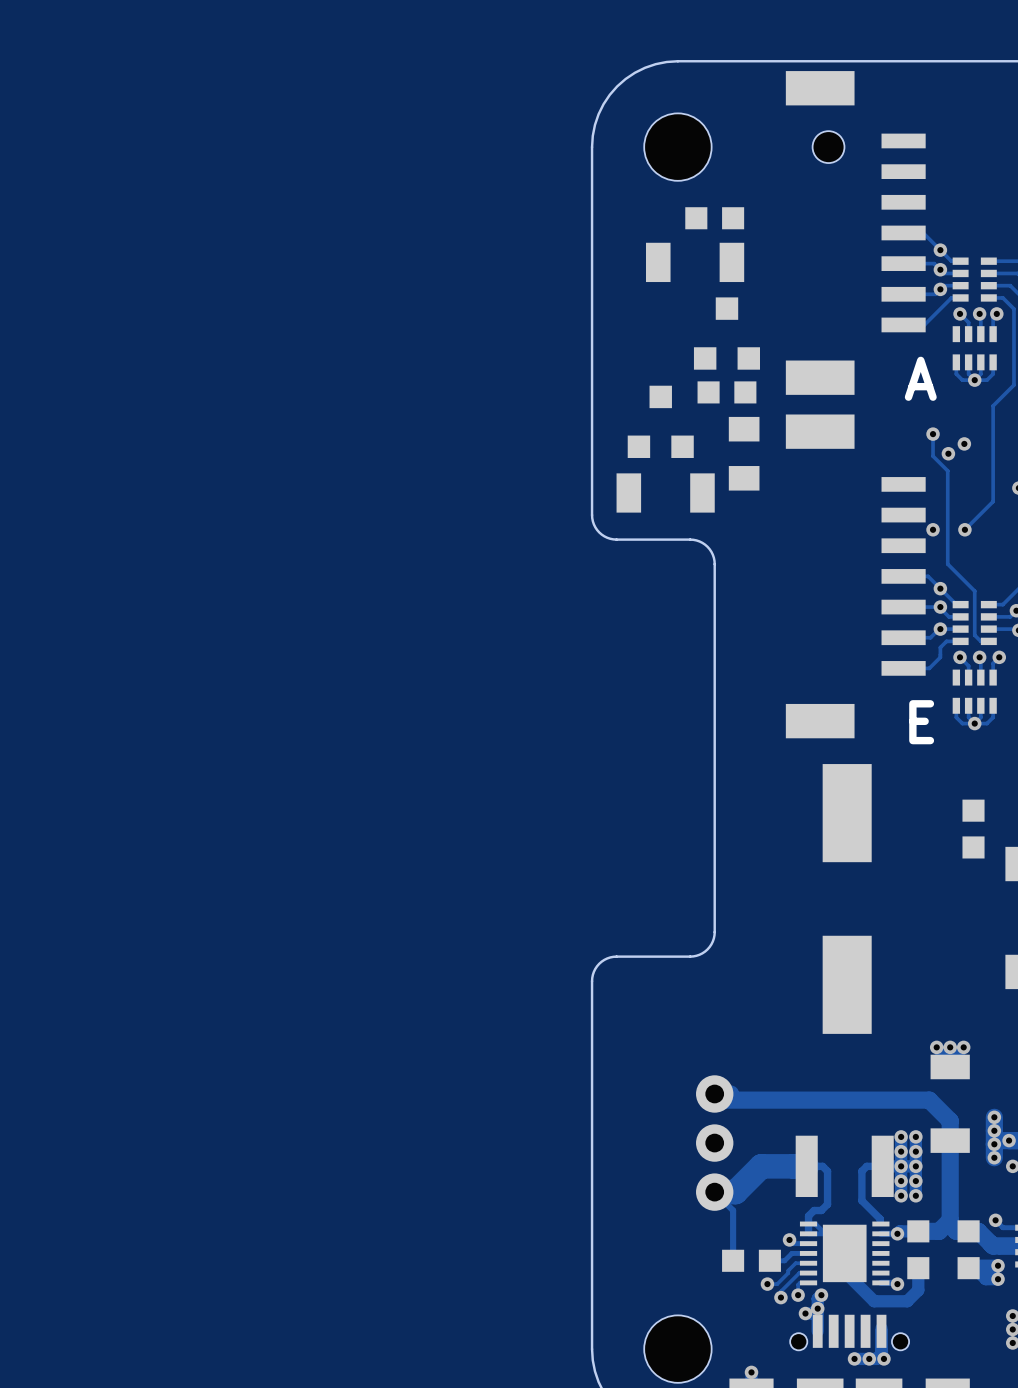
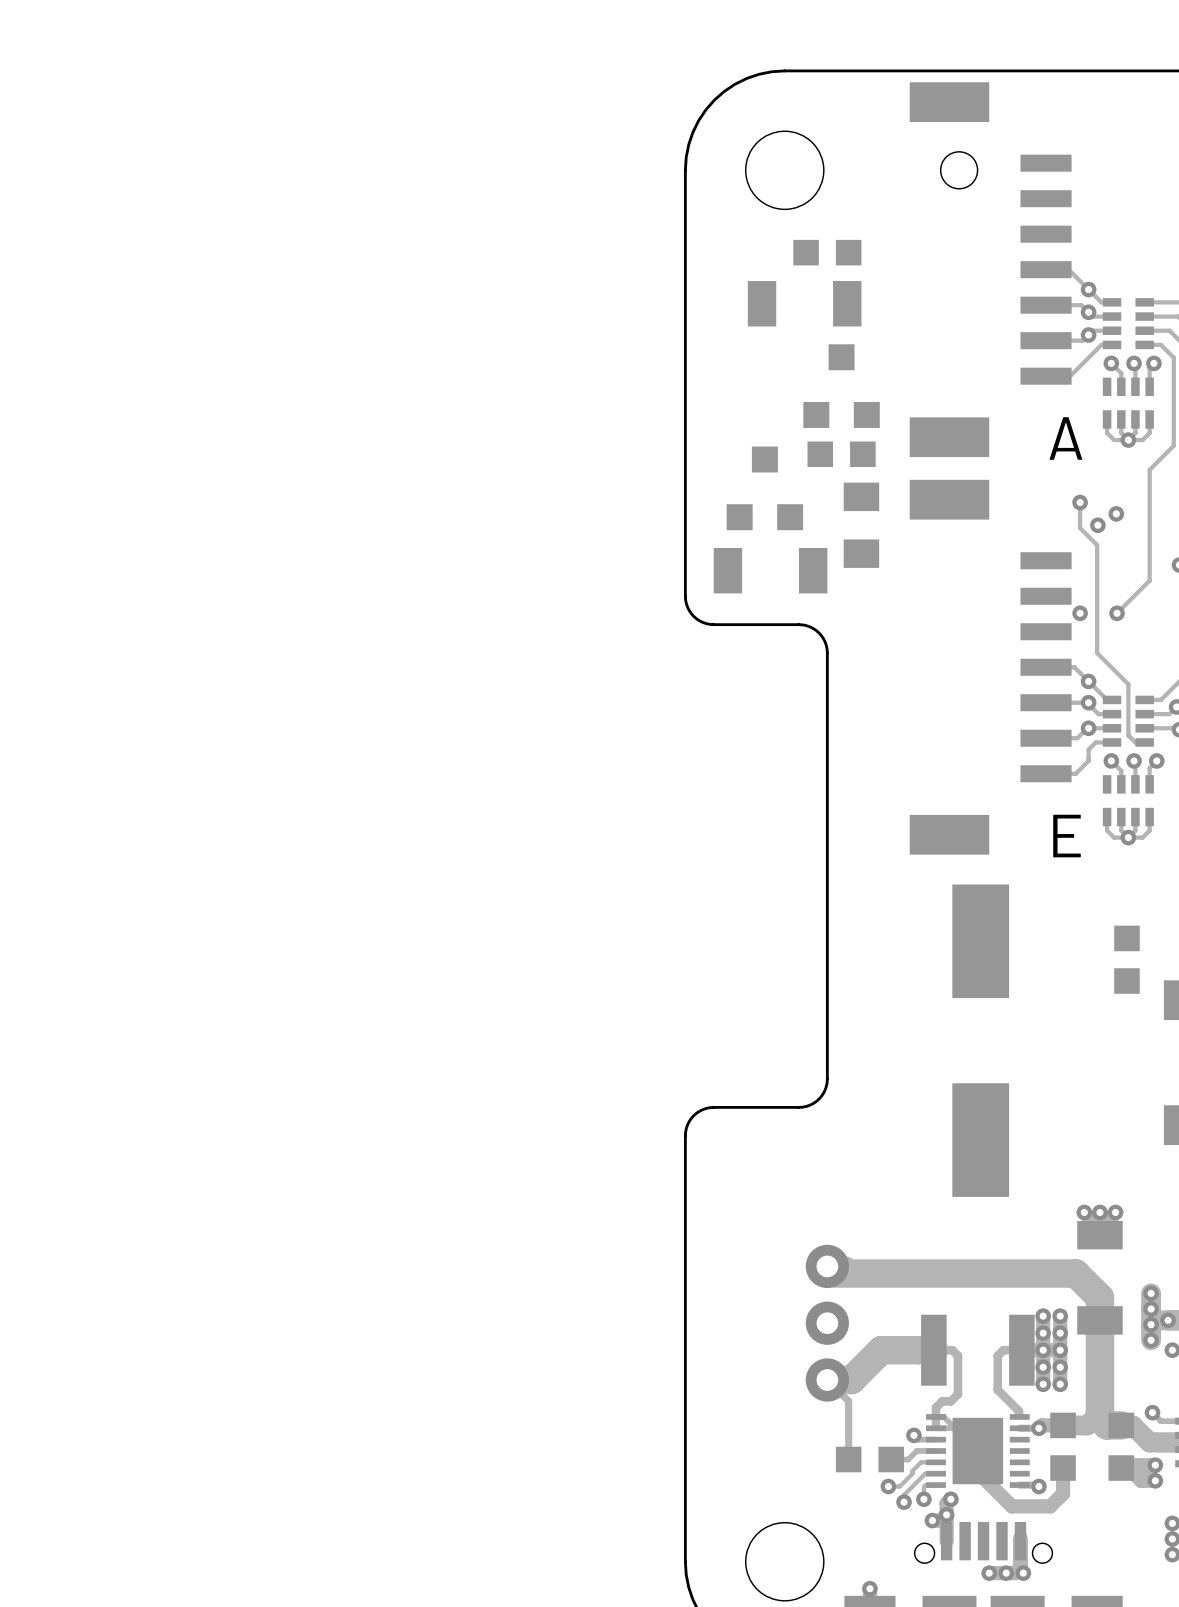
track width: thin (720, 1100) (929, 1100) (950, 1120) (950, 1225) (956, 1231) (968, 1231) -> thick (834, 1273) (1075, 1273) (1099, 1297) (1099, 1418) (1107, 1425) (1121, 1425)

